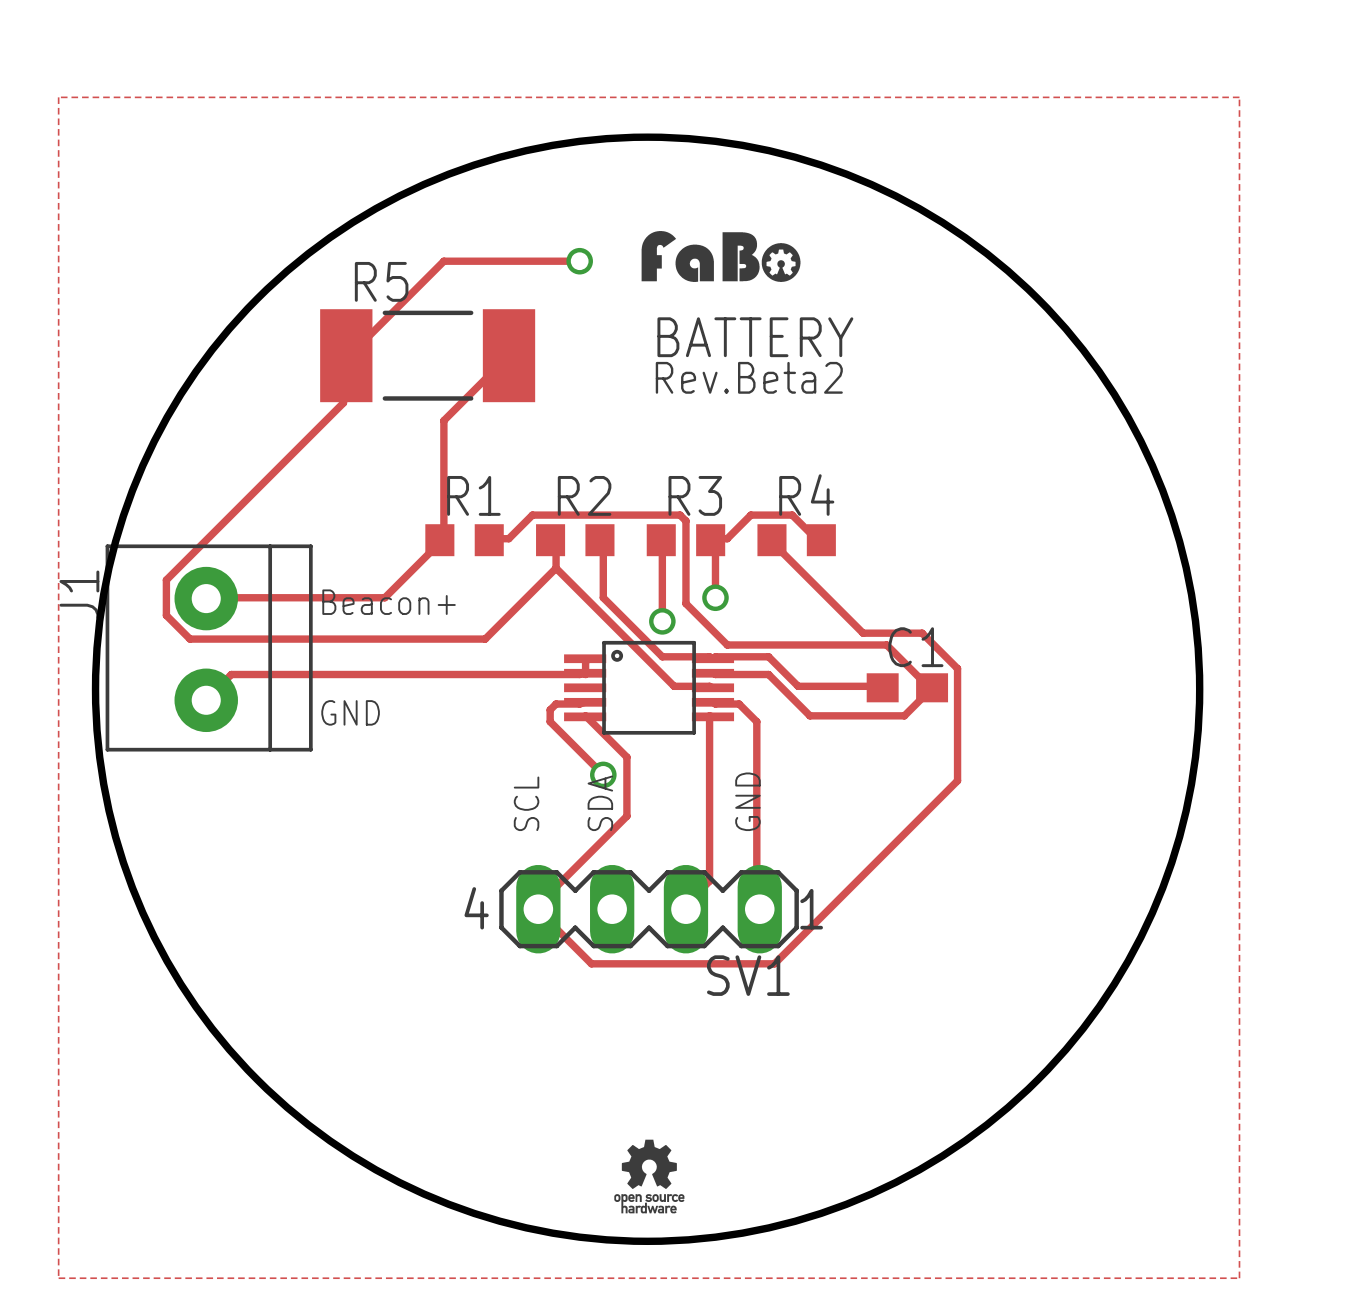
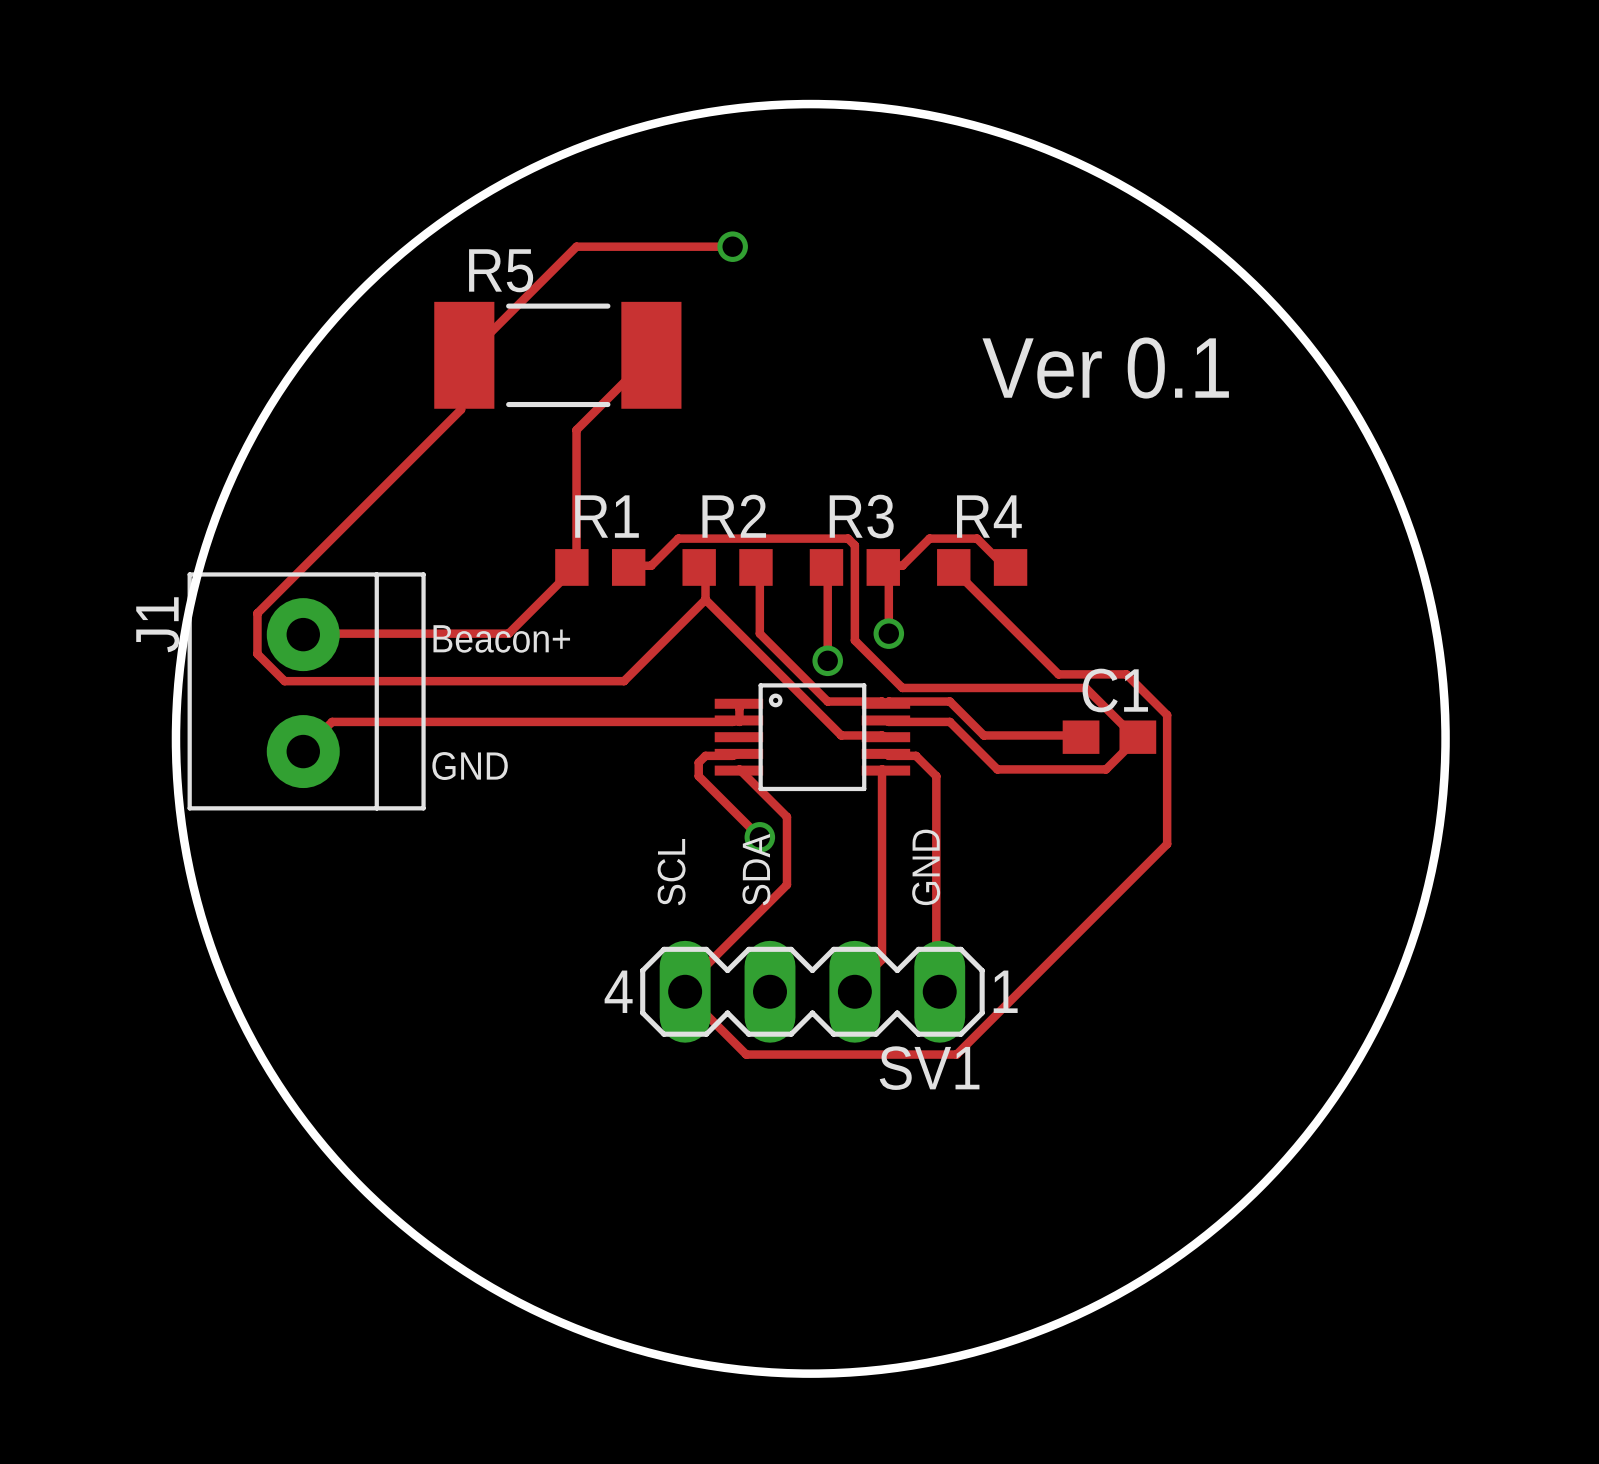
zone outline: (58, 97) (1239, 97) (1239, 1278) (58, 1278) (58, 97) -> none
drawing: [641, 231, 801, 282] -> none
text: BATTERY (755, 337) -> none
text: none -> Ver 0.1 (1105, 368)
text: Rev.Beta2 (749, 377) -> none
drawing: [614, 1139, 685, 1214] -> none

